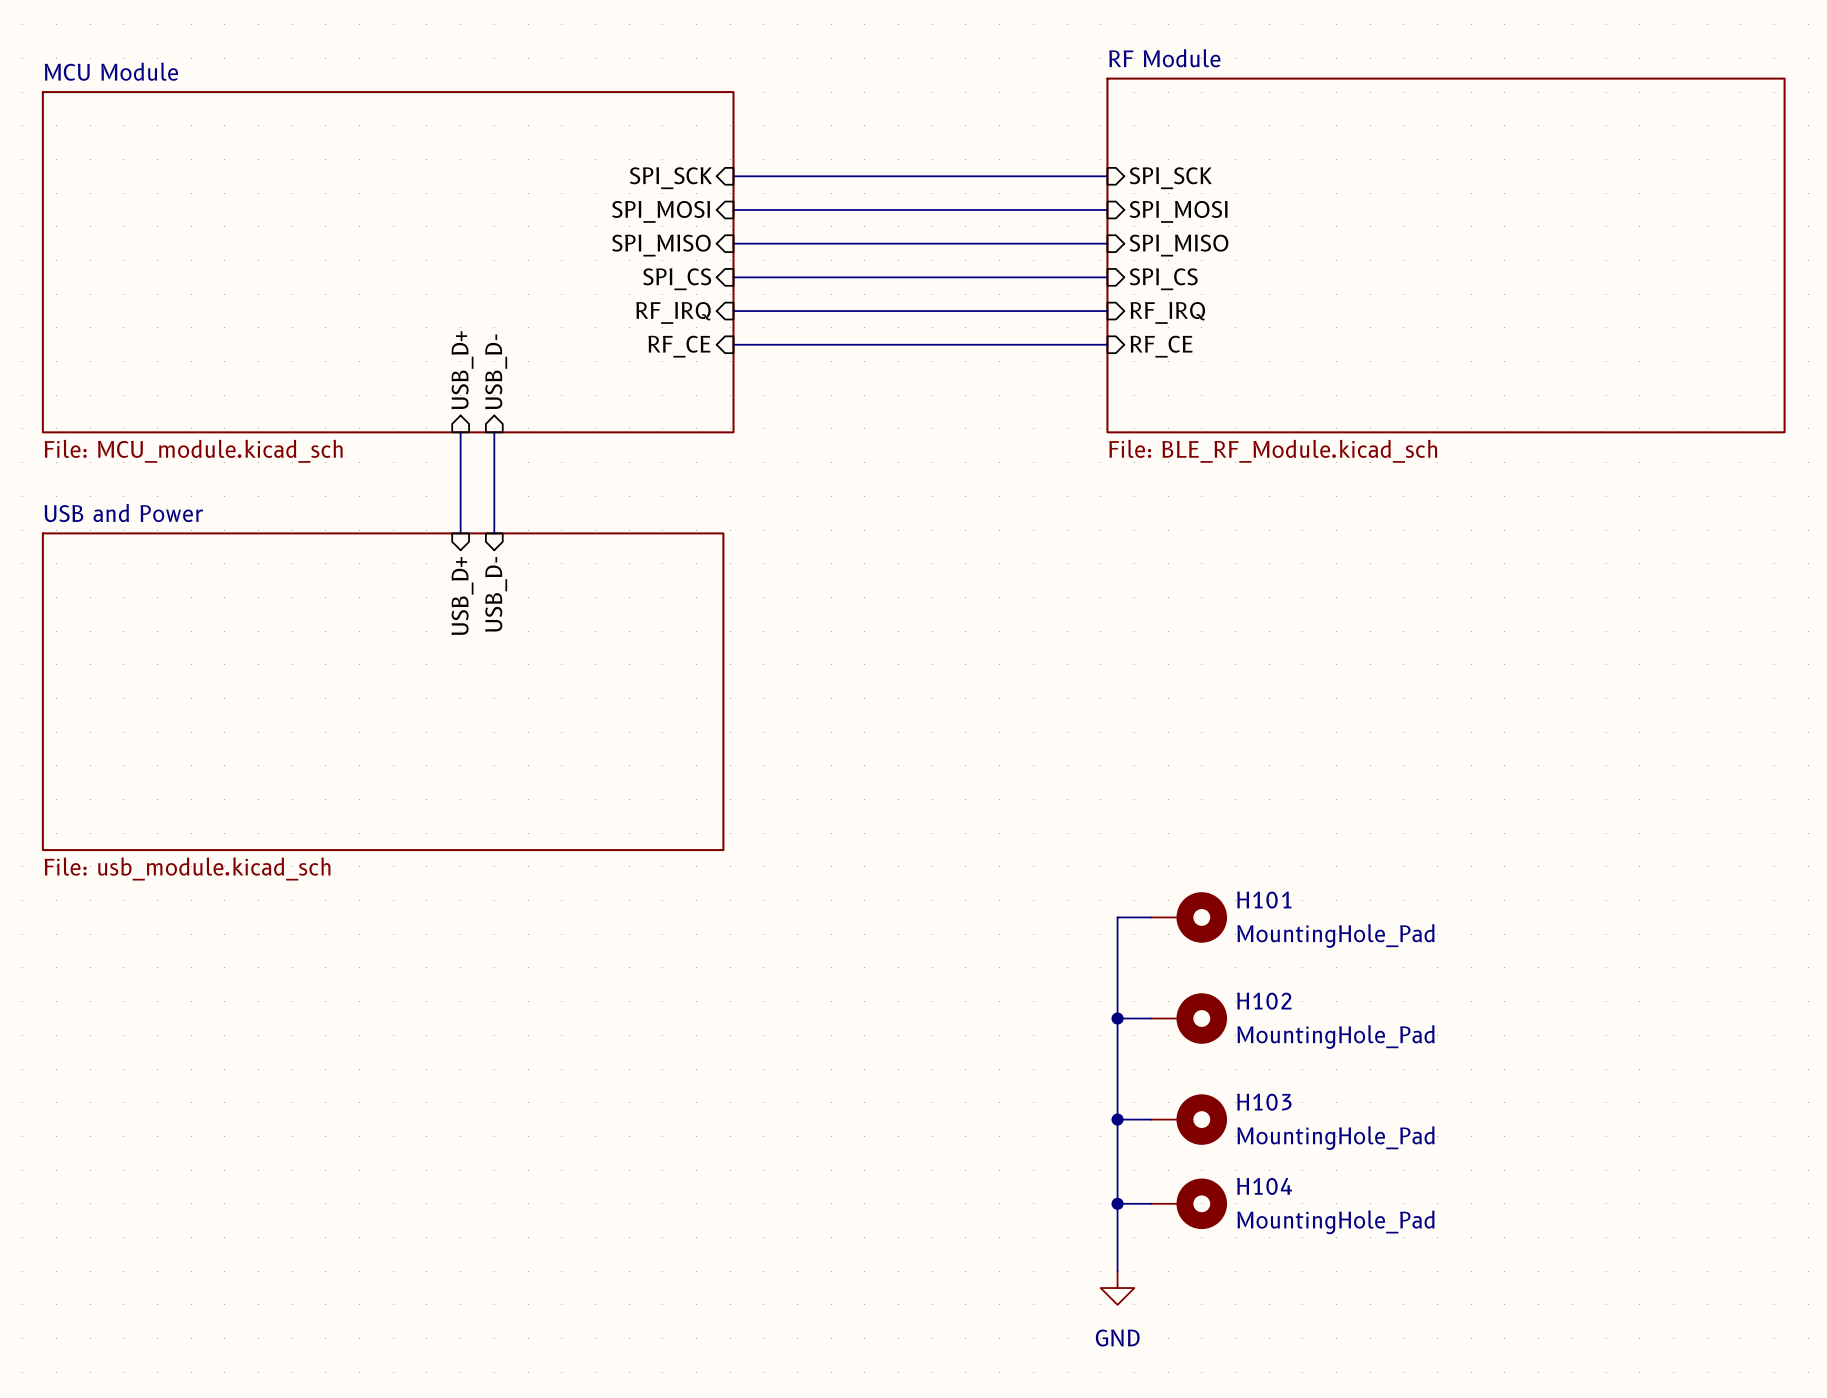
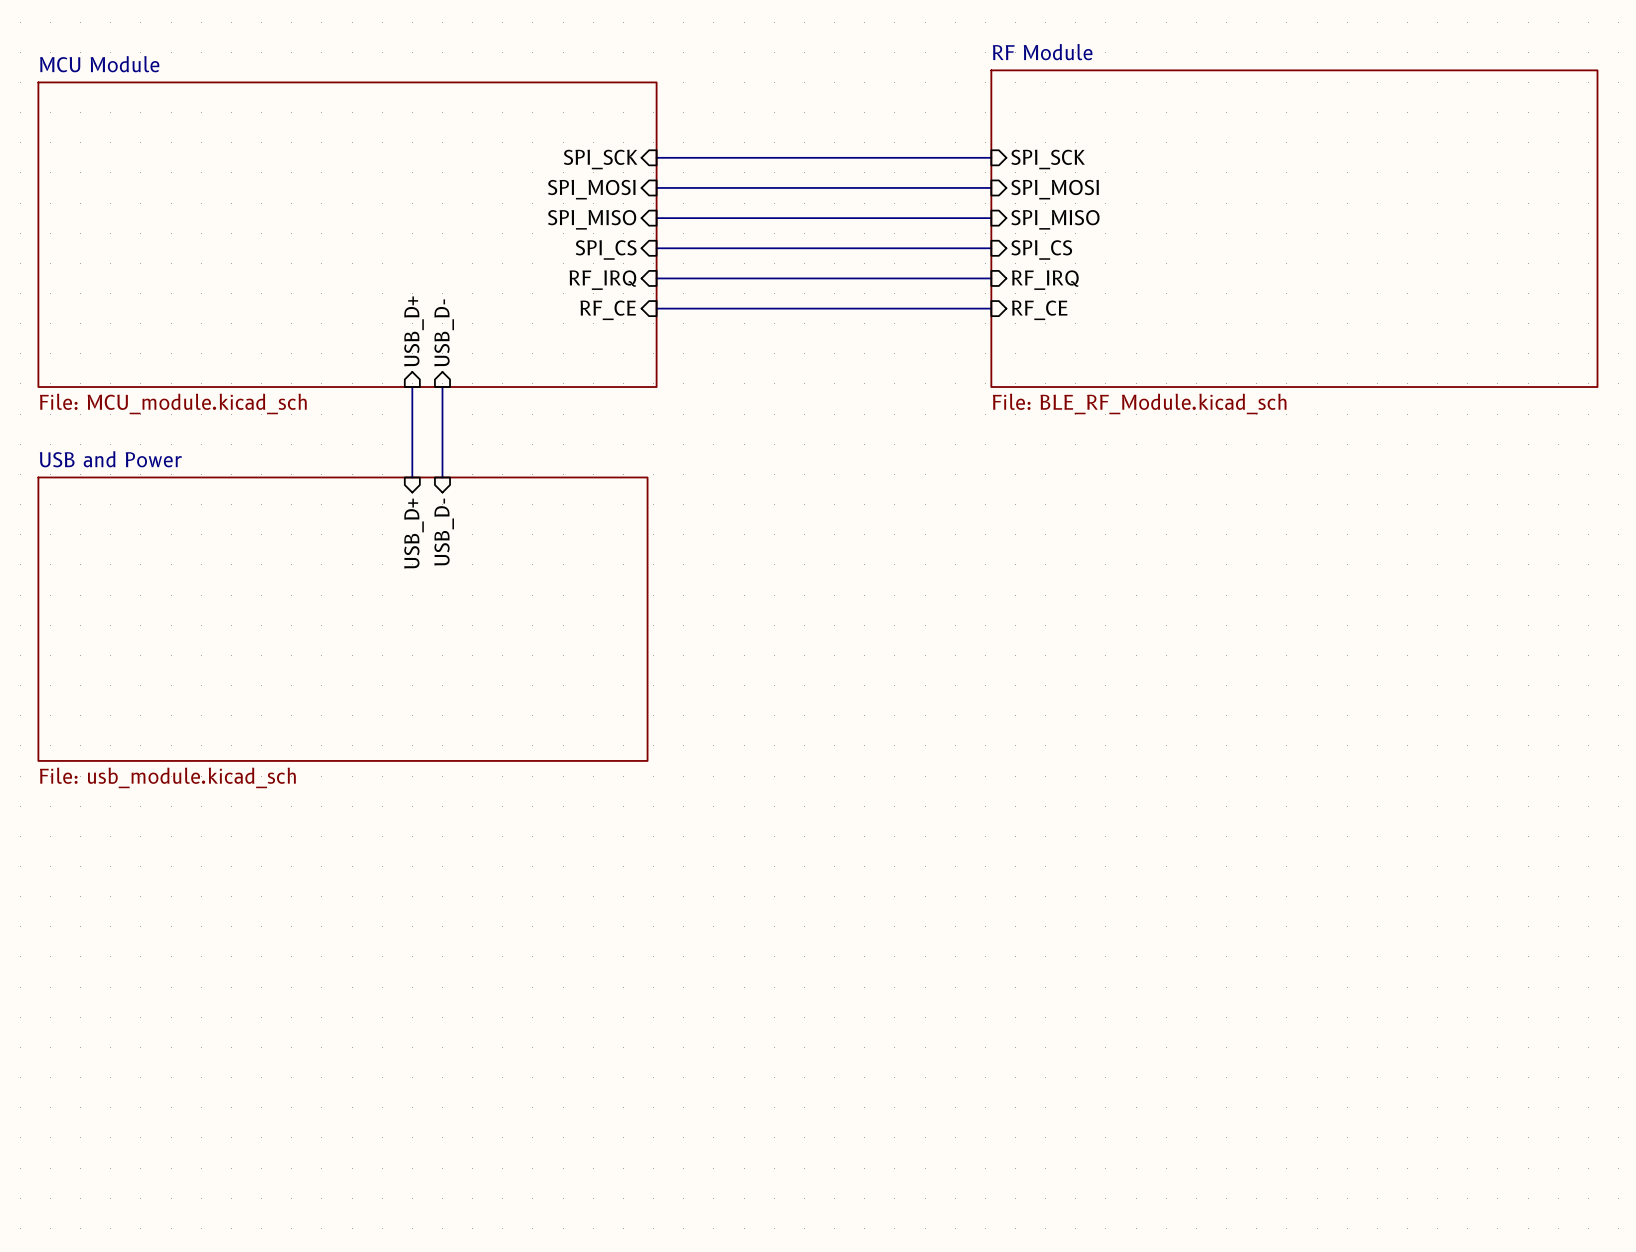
wire: (1151, 917) (1117, 917) (1117, 1271) -> none
H101: MountingHole_Pad (1189, 917) -> none
wire: (1117, 1018) (1151, 1018) -> none
junction: (1117, 1018) -> none
H102: MountingHole_Pad (1189, 1018) -> none
wire: (1117, 1119) (1151, 1119) -> none
junction: (1117, 1119) -> none
H103: MountingHole_Pad (1189, 1119) -> none
wire: (1117, 1203) (1151, 1203) -> none
junction: (1117, 1203) -> none
H104: MountingHole_Pad (1189, 1203) -> none
power symbol: GND (1117, 1288) -> none

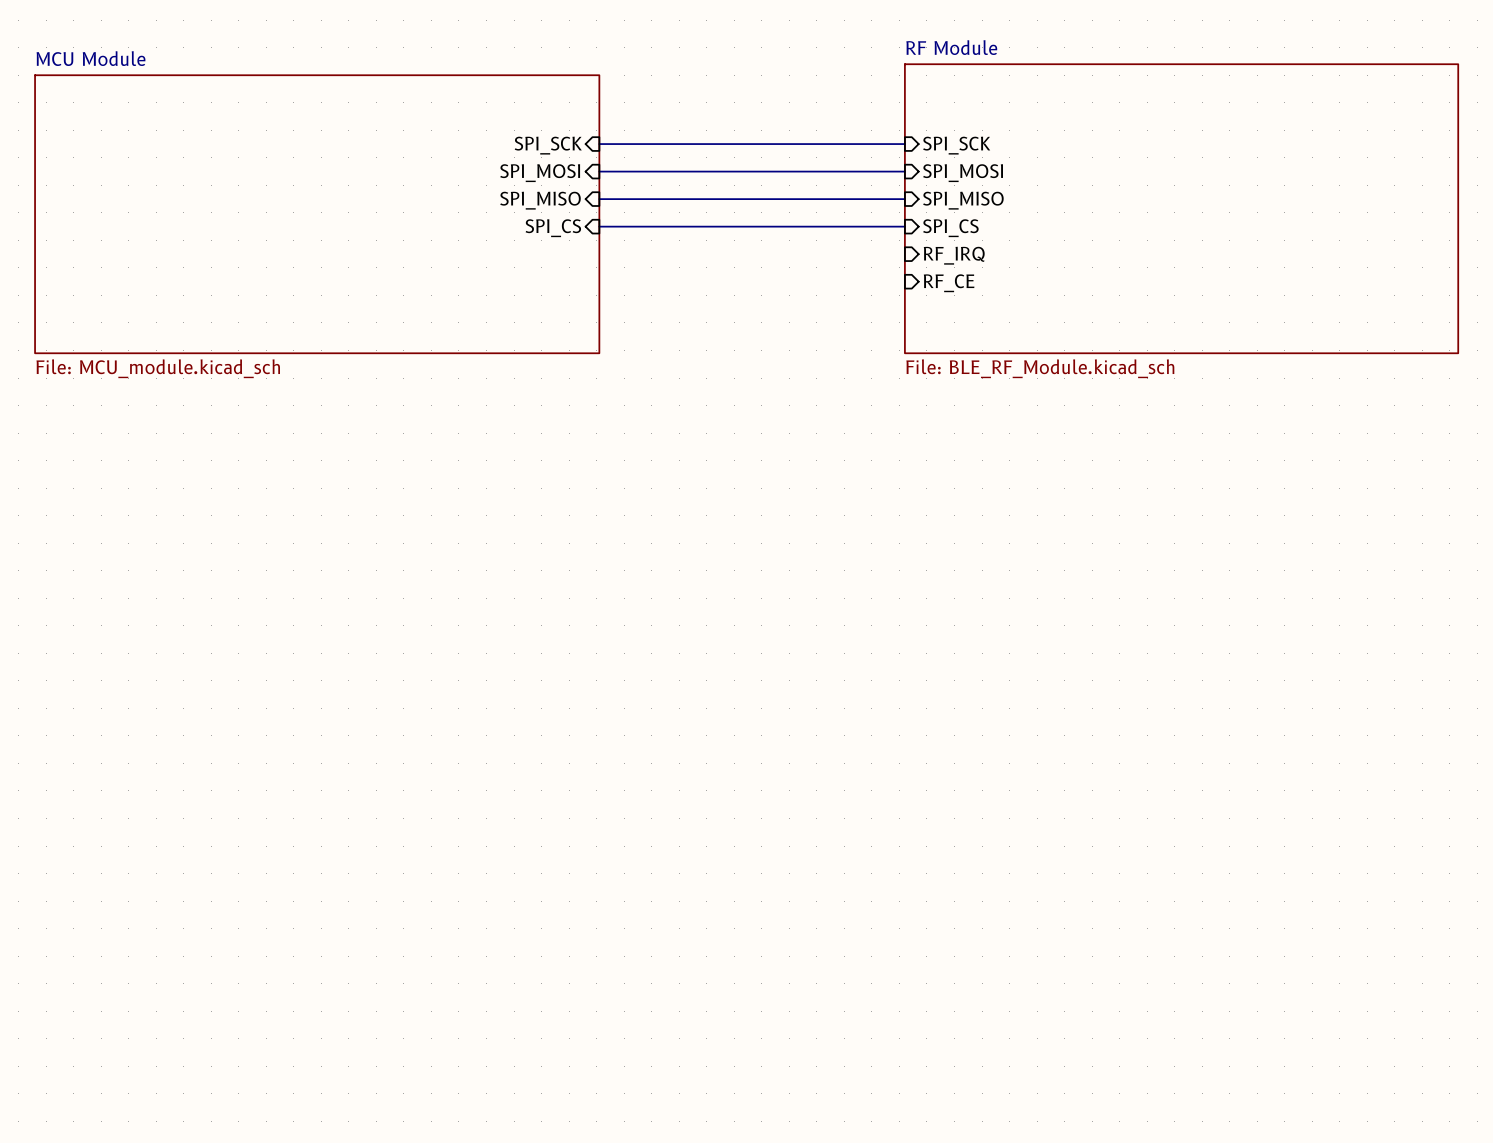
wire: (656, 278) (991, 278) -> none
sheet pin: RF_IRQ (602, 280) -> none
wire: (656, 308) (991, 308) -> none
sheet pin: RF_CE (608, 310) -> none
sheet pin: USB_D+ (414, 331) -> none
sheet pin: USB_D- (444, 332) -> none
wire: (412, 387) (412, 477) -> none
wire: (442, 387) (442, 477) -> none
sheet pin: USB_D- (444, 532) -> none
sheet pin: USB_D+ (414, 533) -> none
sheet USB and Power: File: usb_module.kicad_sch (342, 619) -> none

